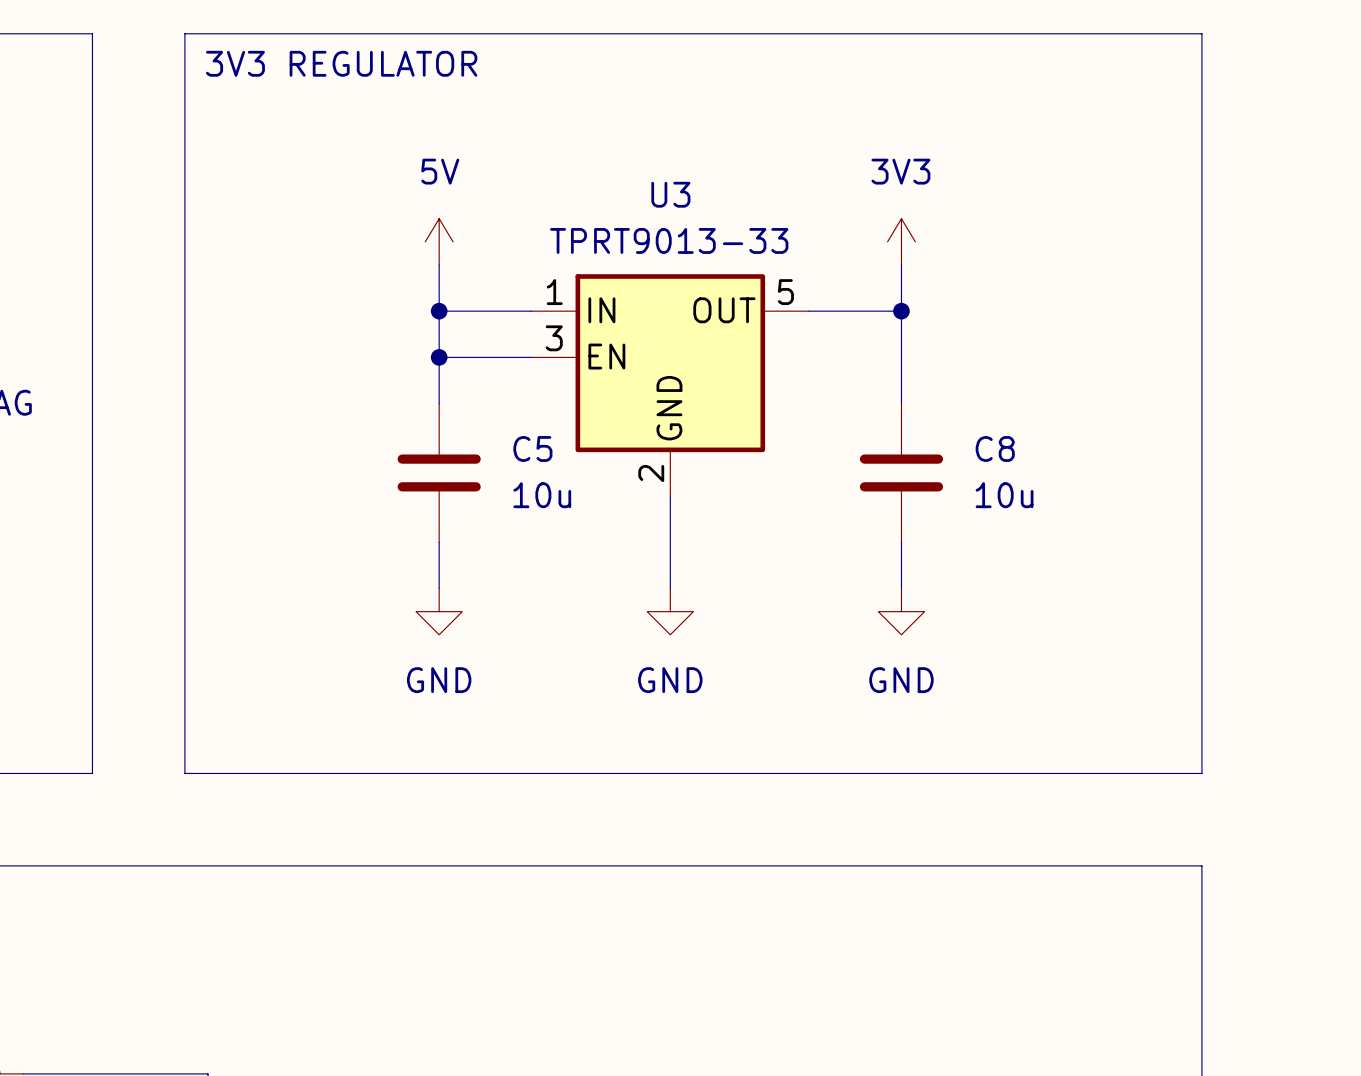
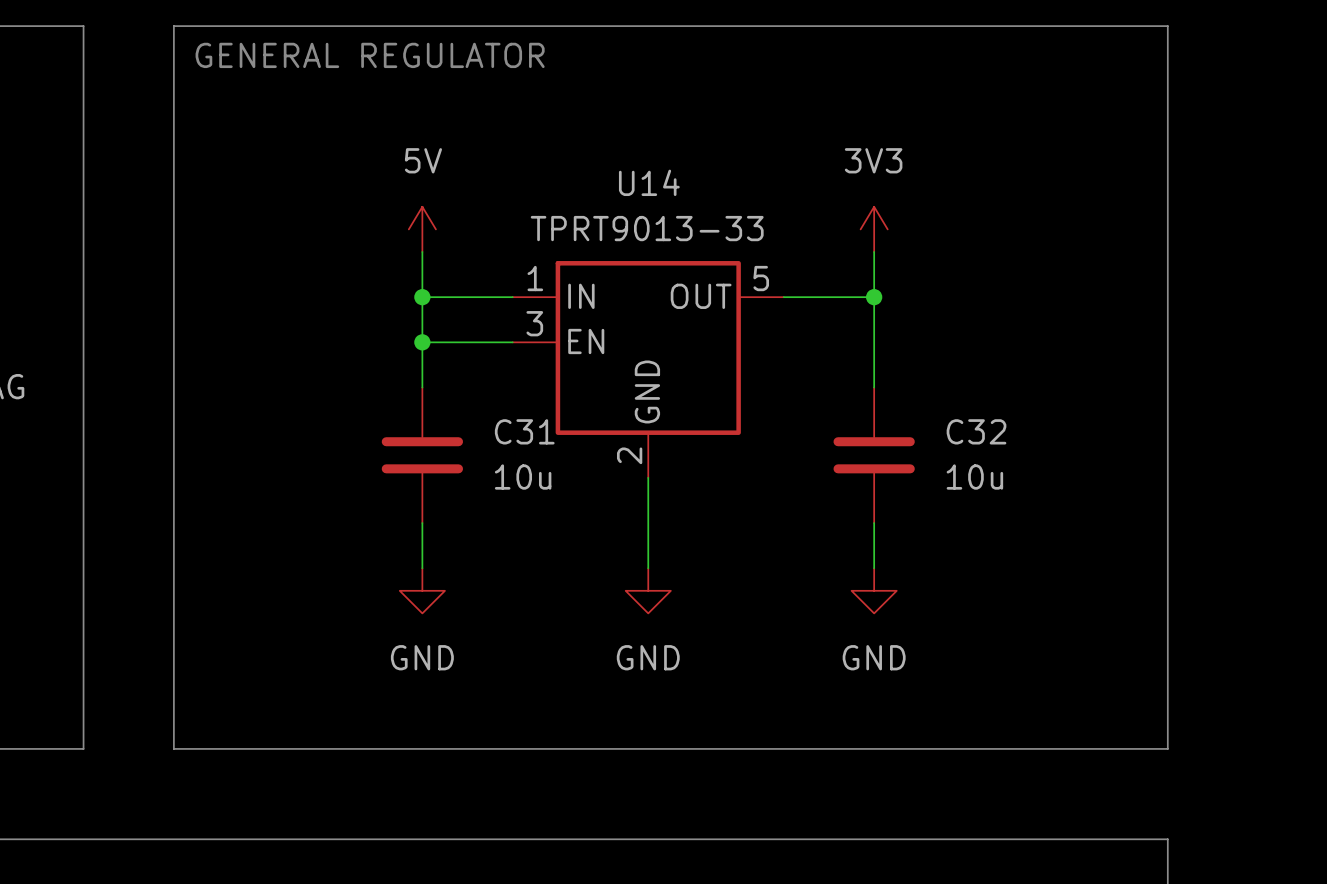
text: 3V3 REGULATOR (341, 63) -> GENERAL REGULATOR (370, 55)
U3 name: U3 (670, 194) -> U14 (649, 182)
C5 name: C5 (532, 448) -> C31 (524, 431)
C8 name: C8 (995, 448) -> C32 (976, 431)

